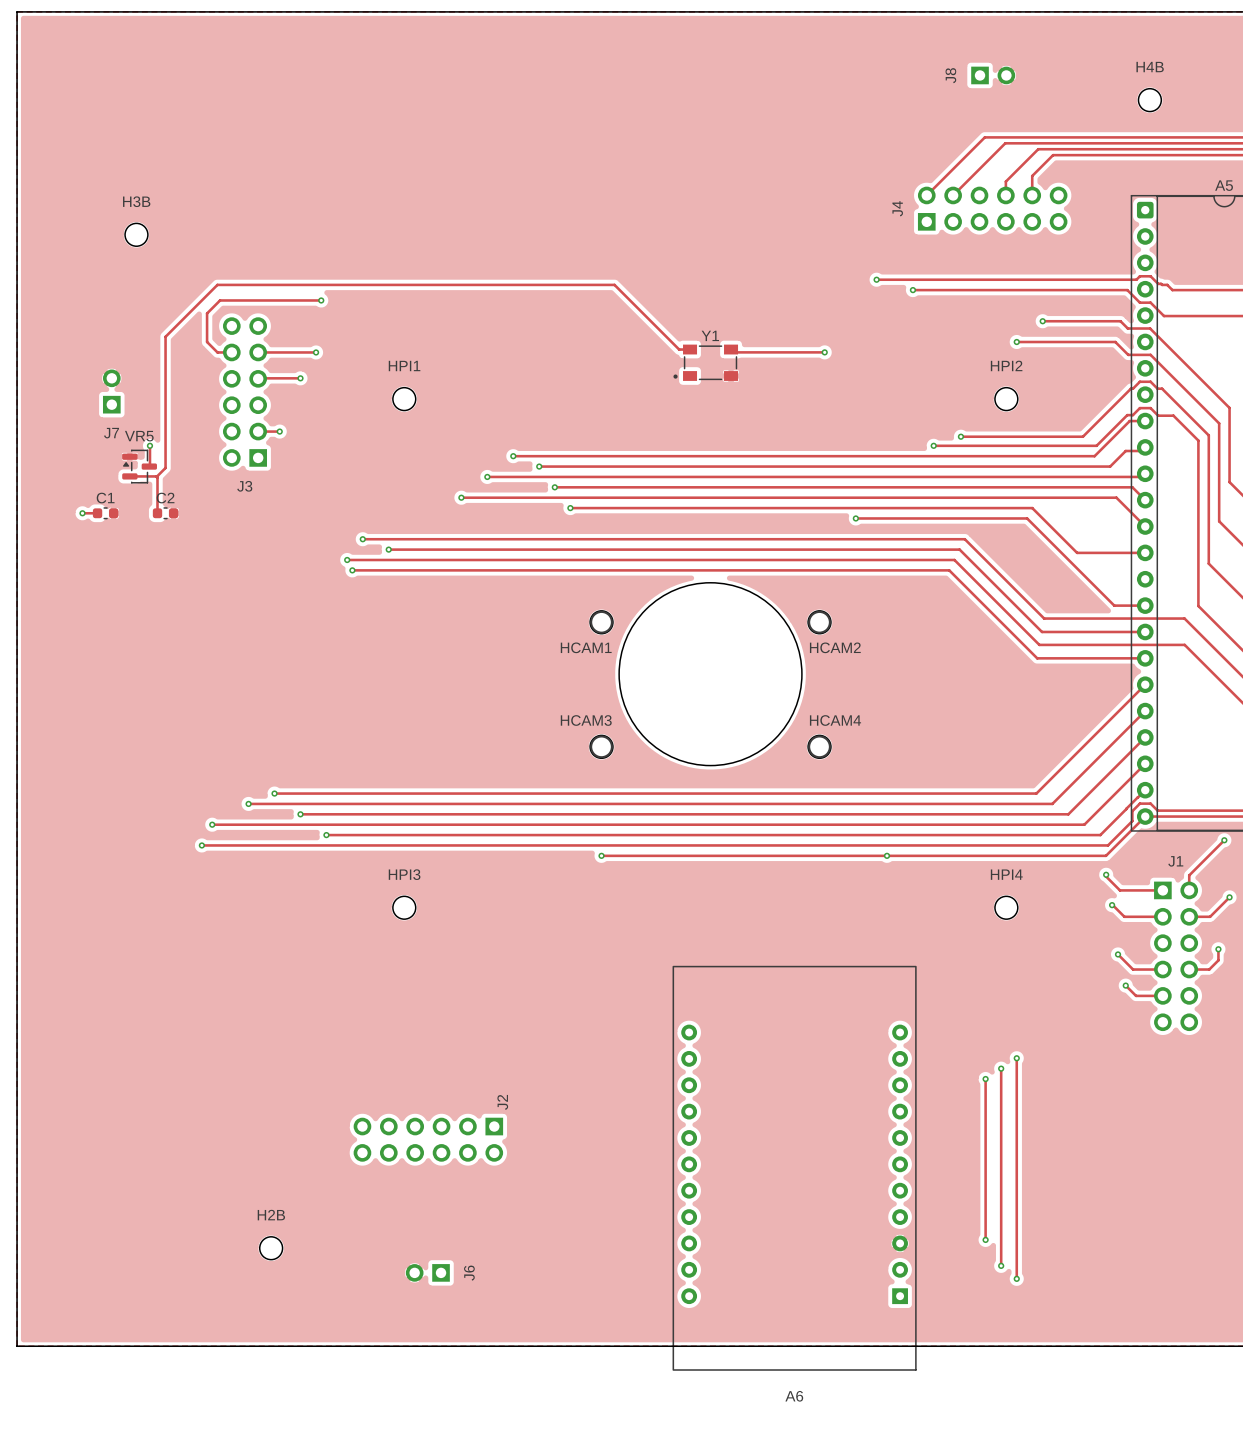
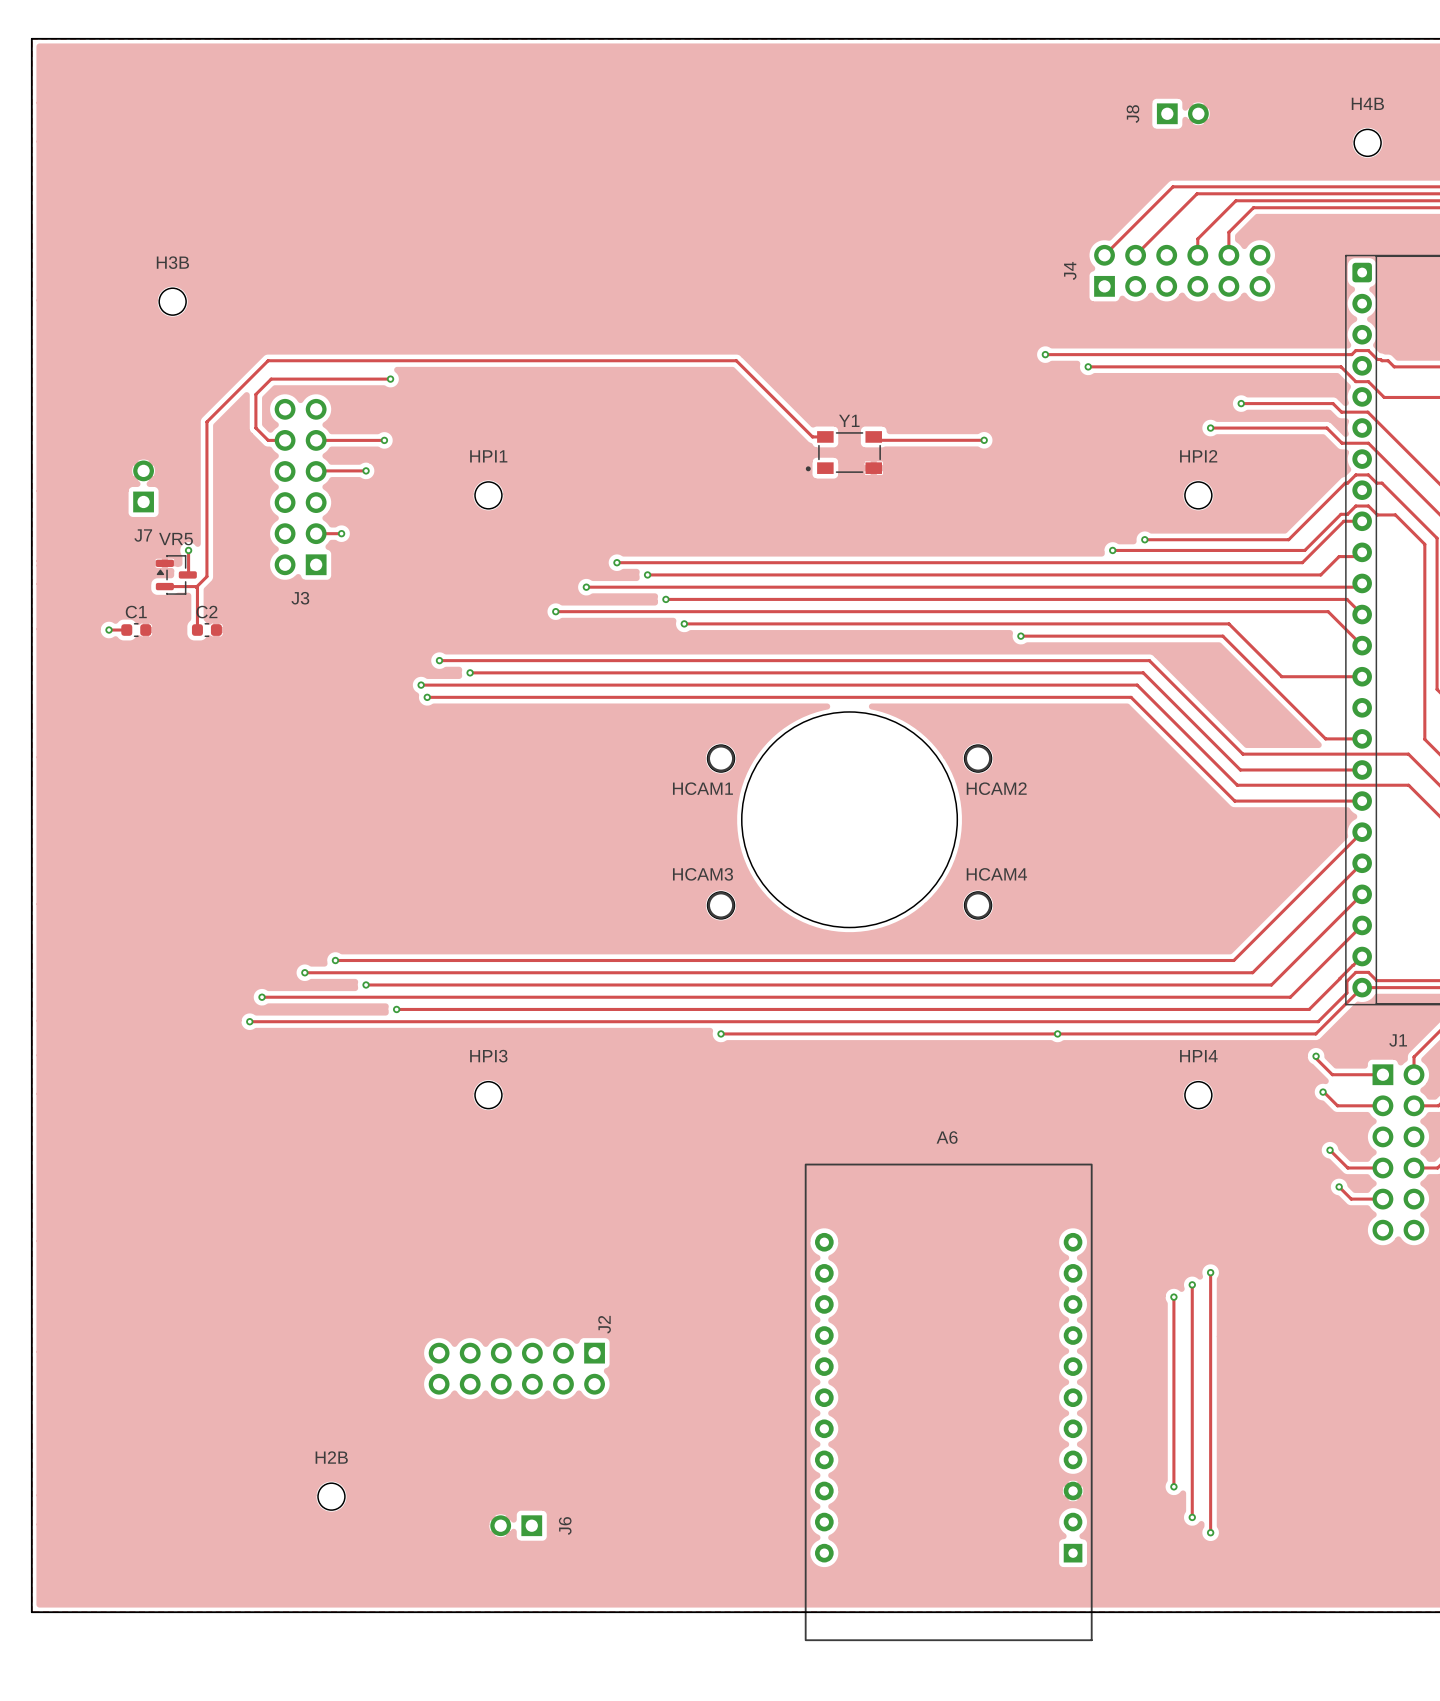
A6 name position: A6 (794, 1396) -> A6 (947, 1137)

